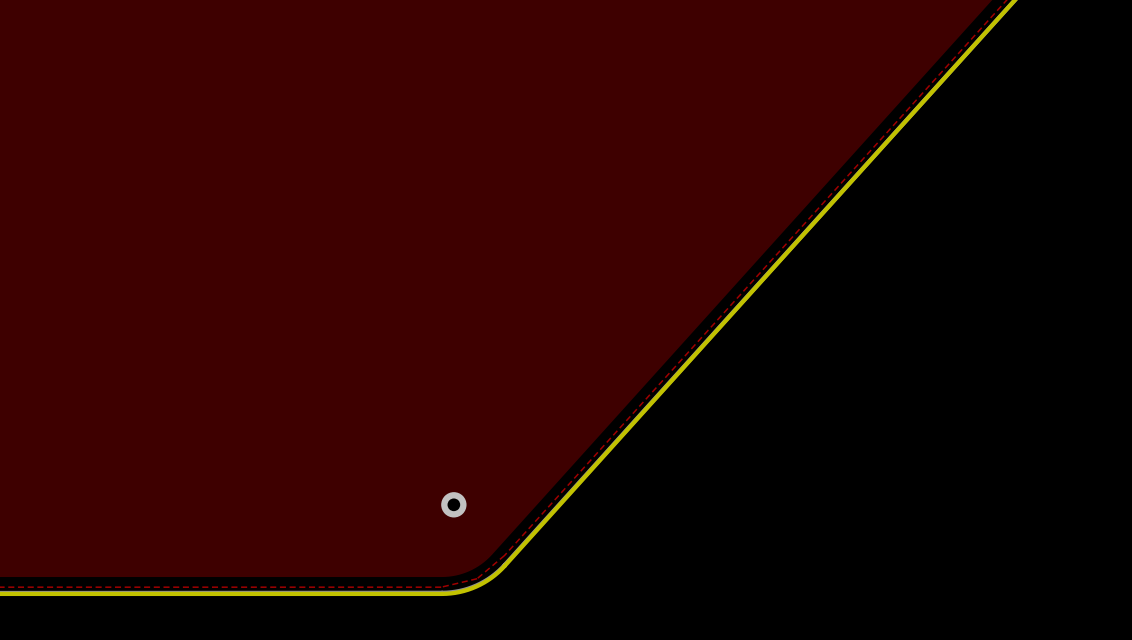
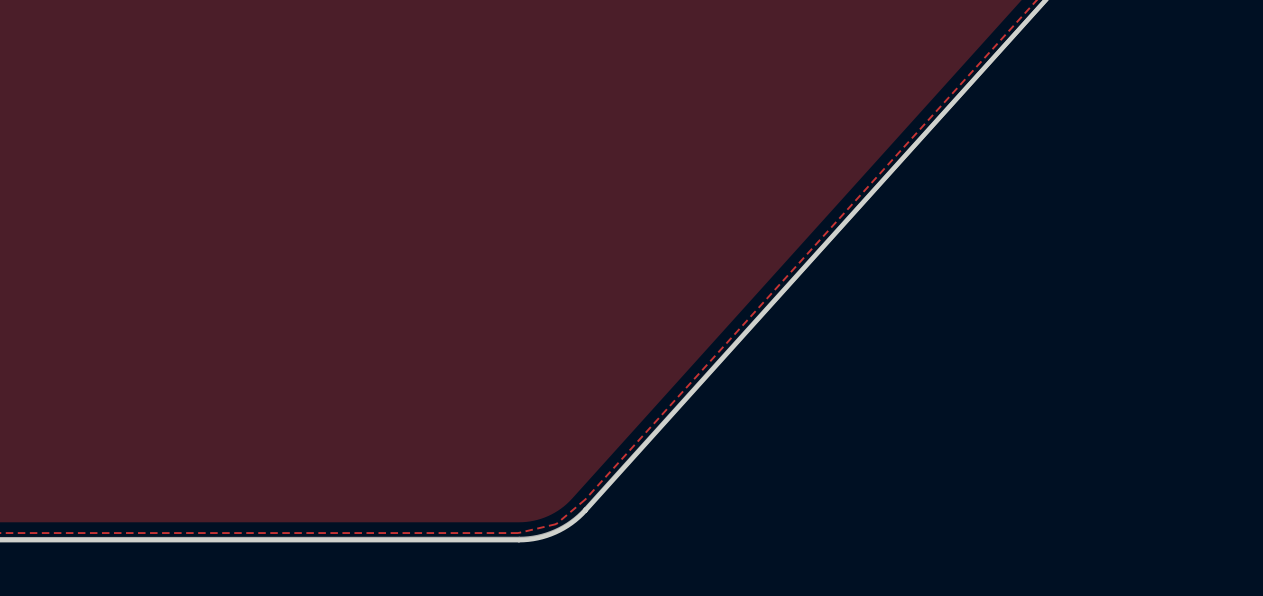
via: (453, 504) -> none

